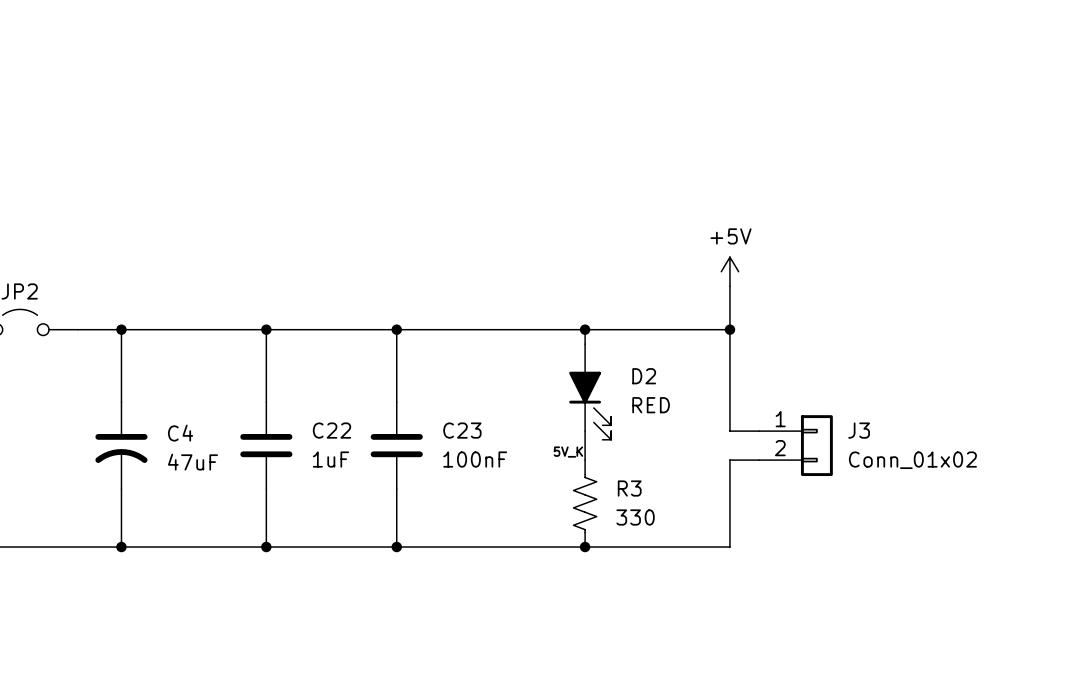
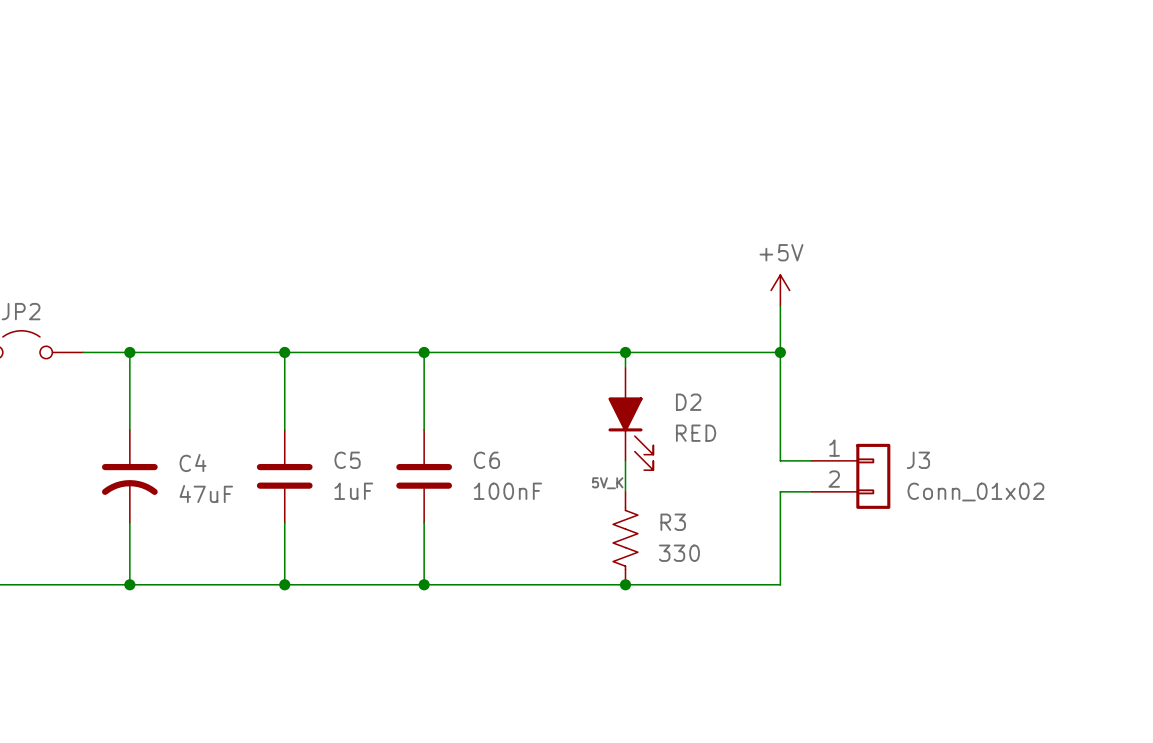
C22 name: C22 (332, 430) -> C5 (347, 460)
C23 name: C23 (462, 430) -> C6 (486, 460)

